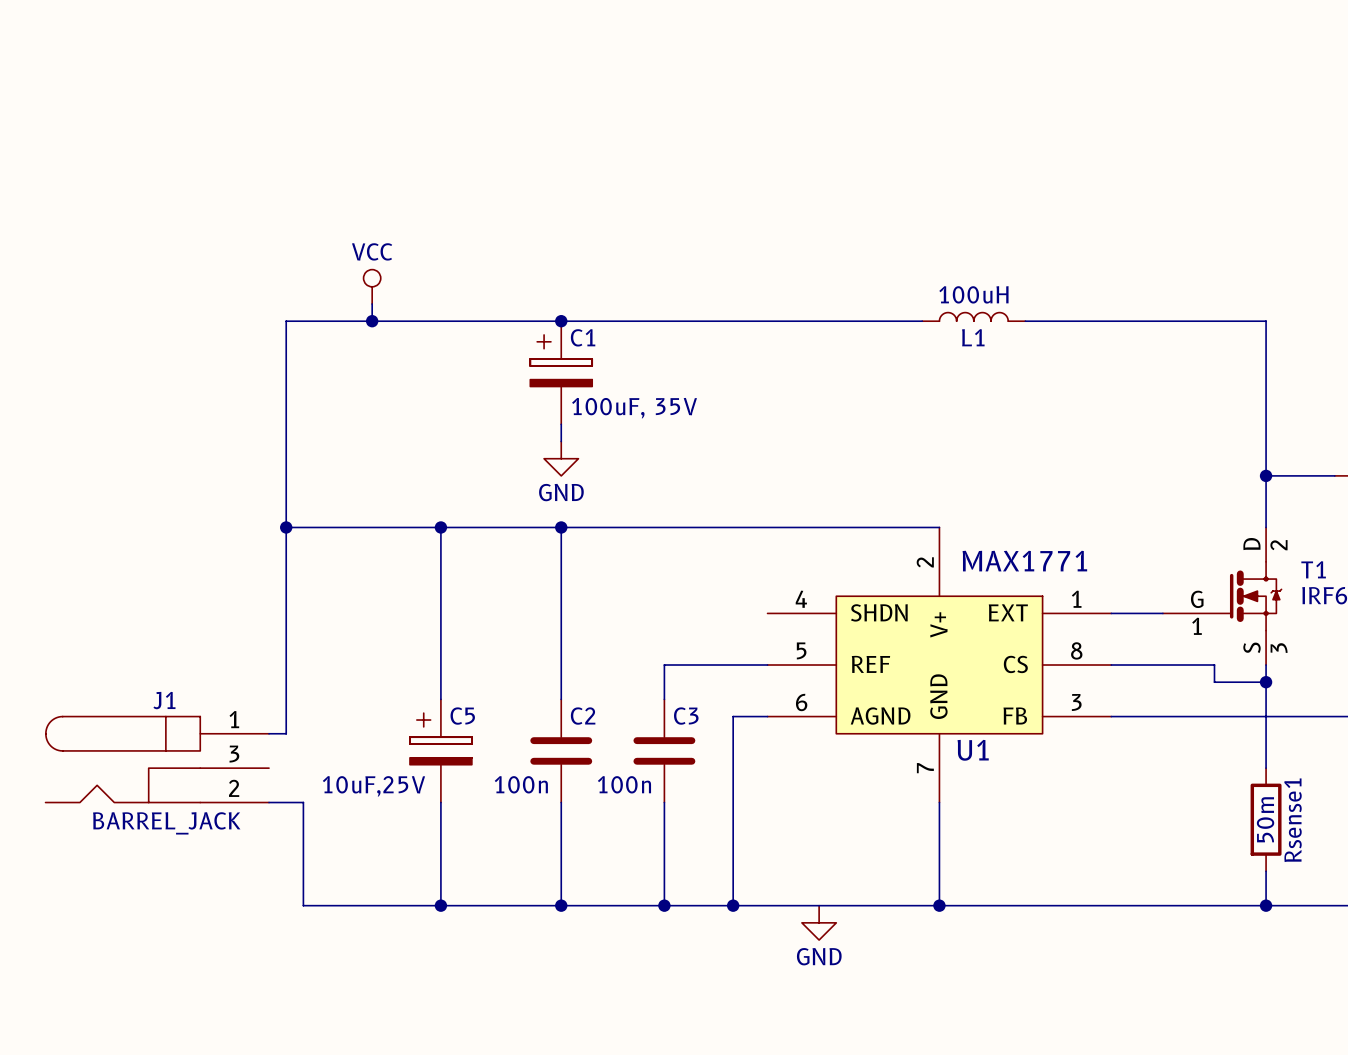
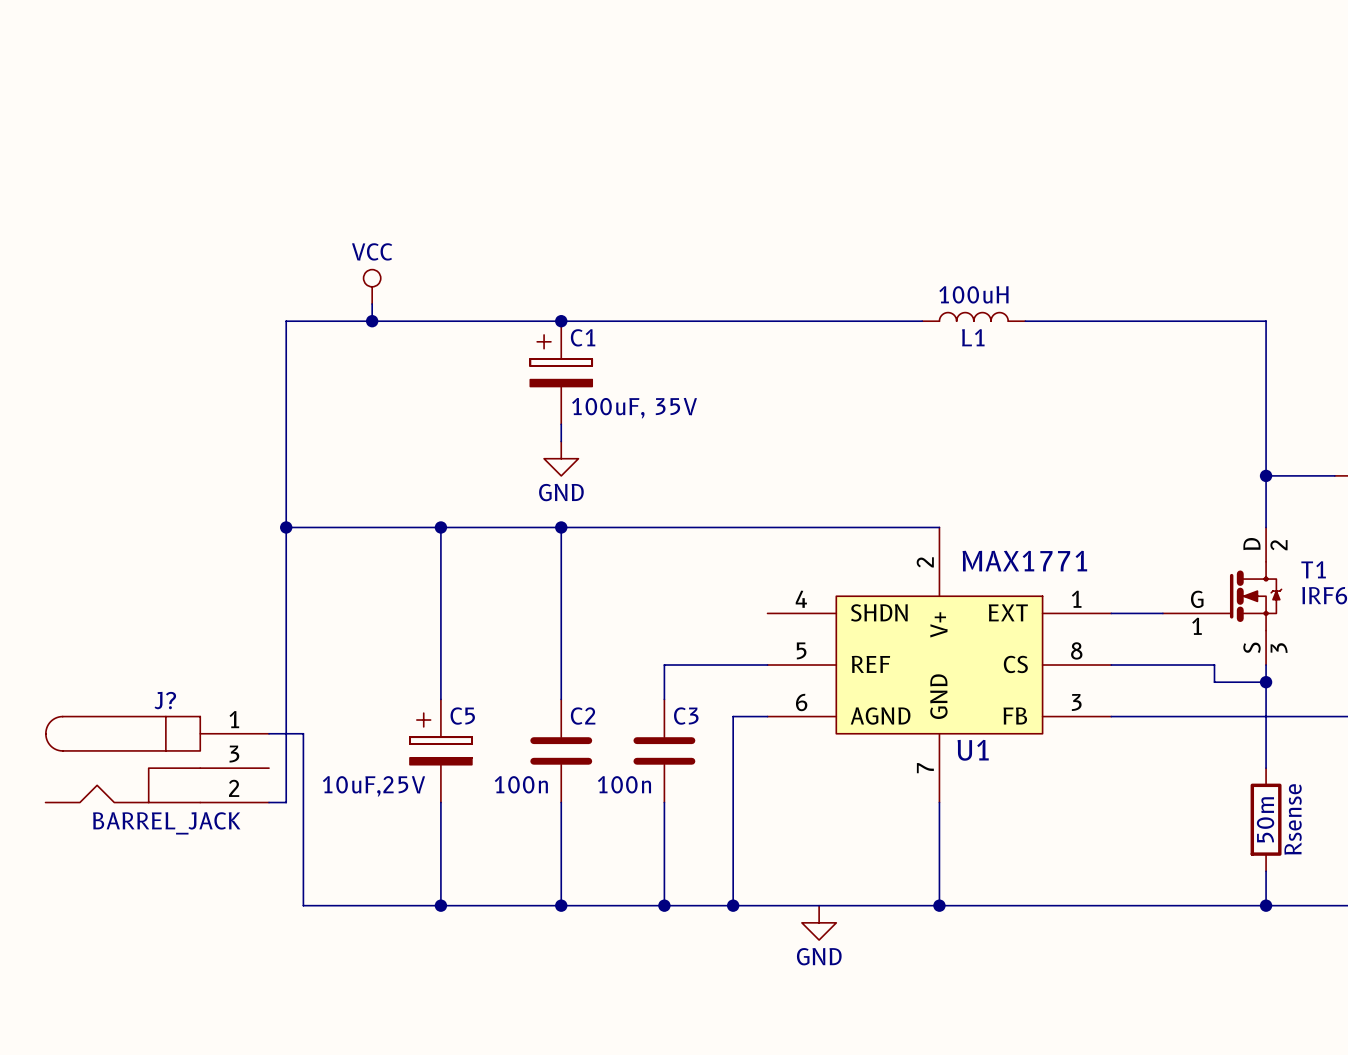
J1 name: J1 (164, 700) -> J? (165, 700)
wire: (286, 802) (303, 802) -> (286, 802) (286, 733) (303, 733) (303, 802)
Rsense1 name: Rsense1 (1293, 820) -> Rsense (1293, 819)

